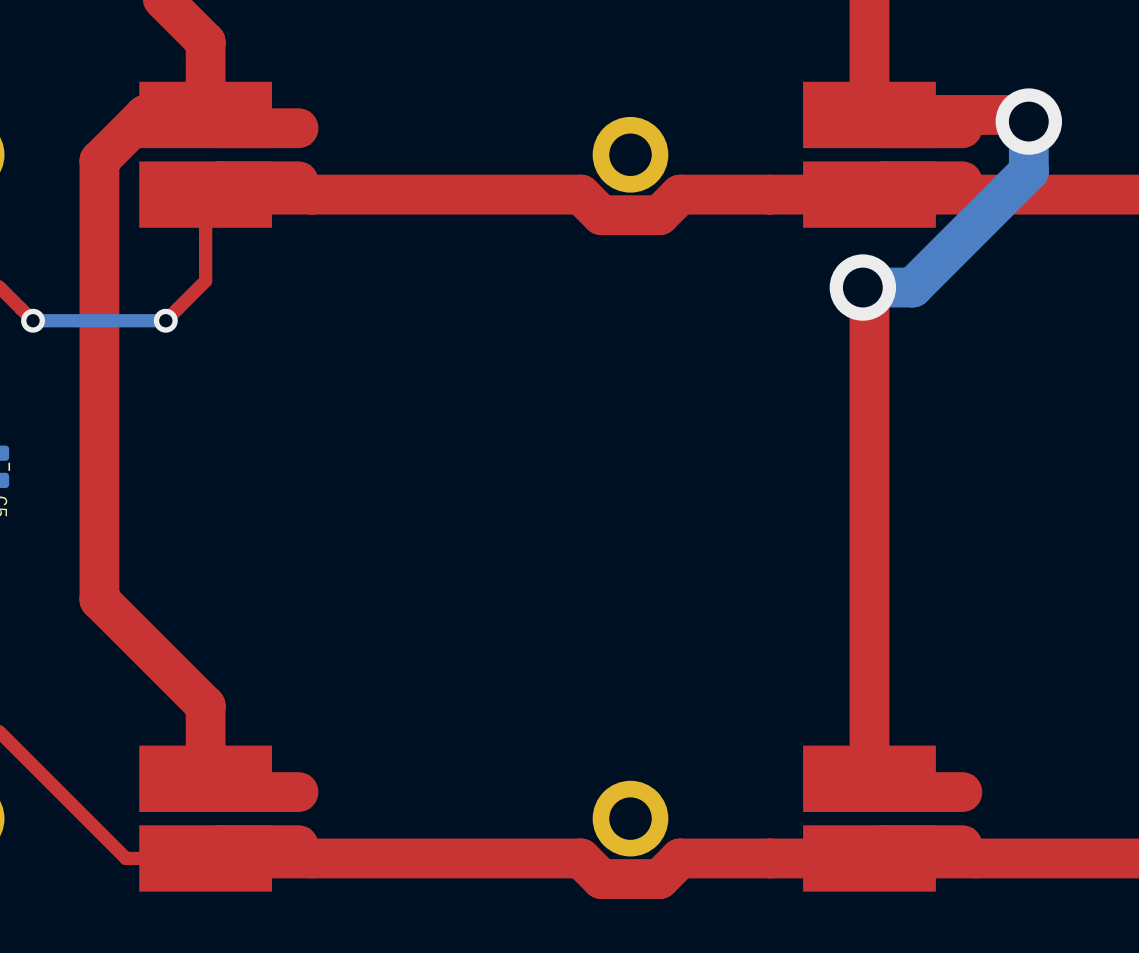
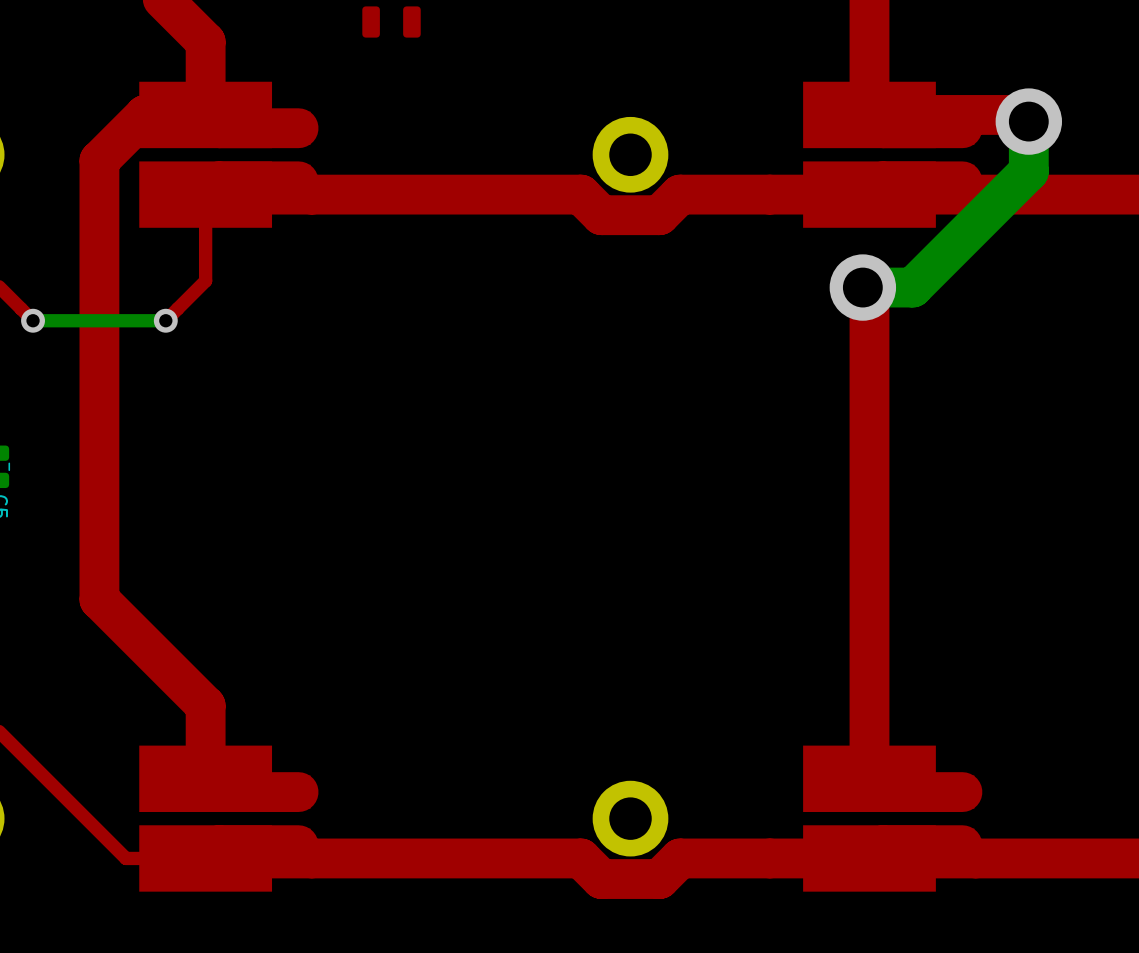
part: none -> (391, 22)

